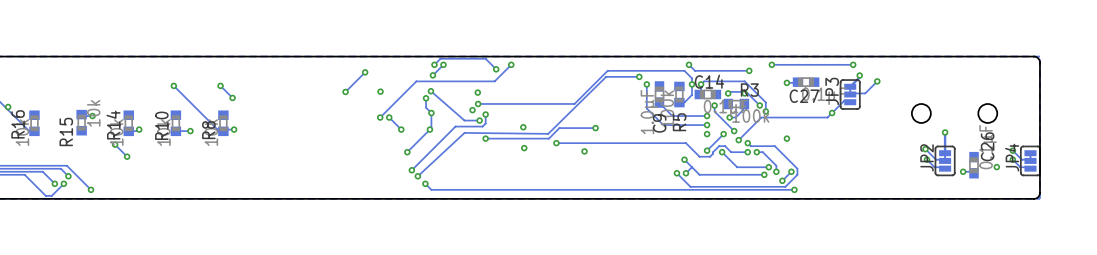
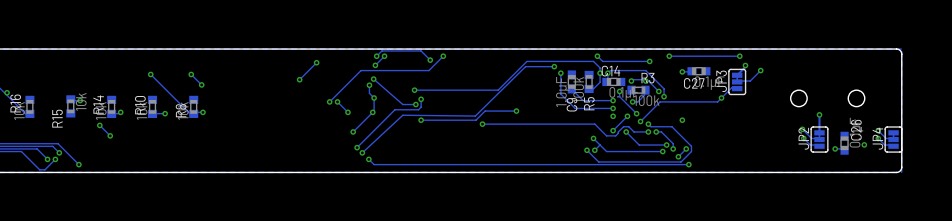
via: (380, 91) -> none
via: (477, 92) -> none
via: (472, 110) -> none
via: (523, 127) -> none
via: (524, 148) -> none
via: (584, 151) -> none

